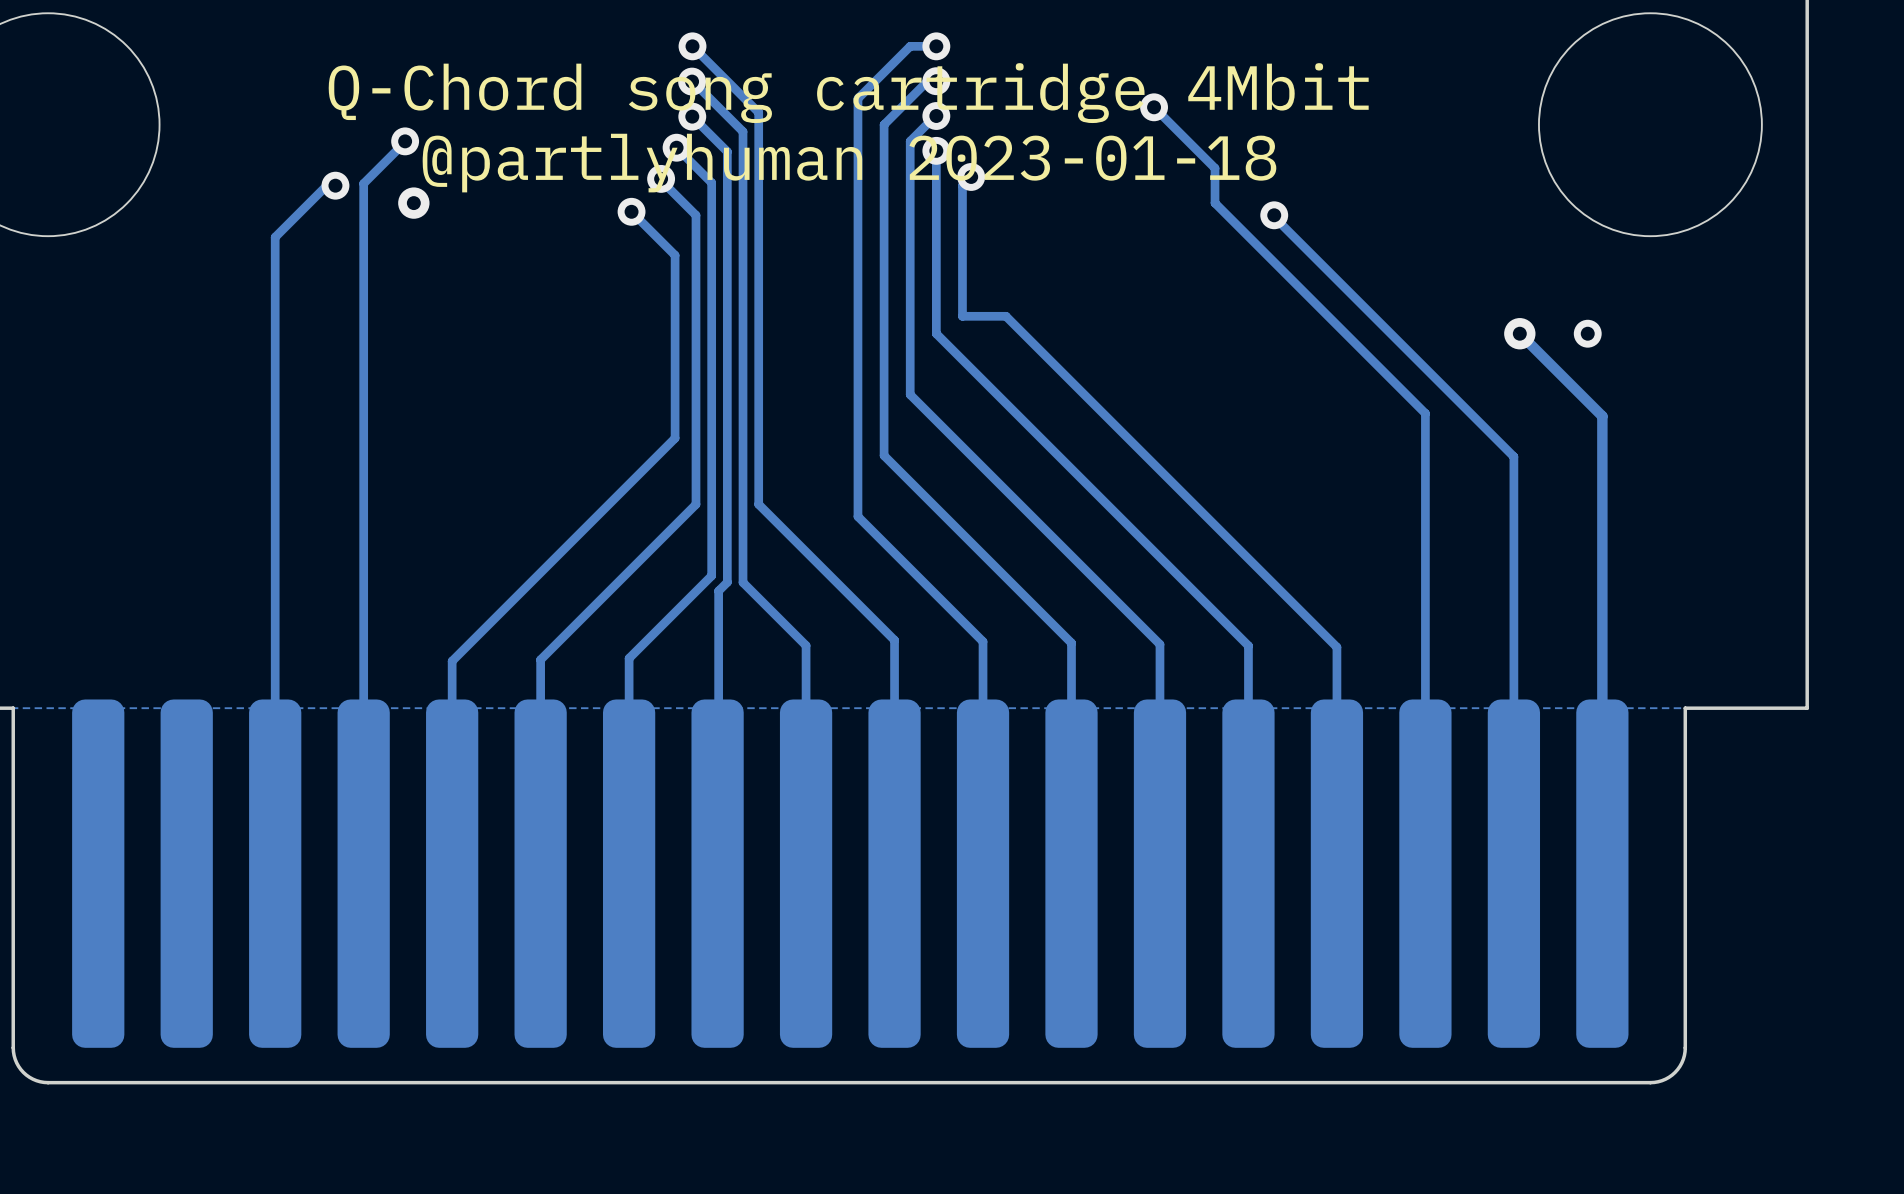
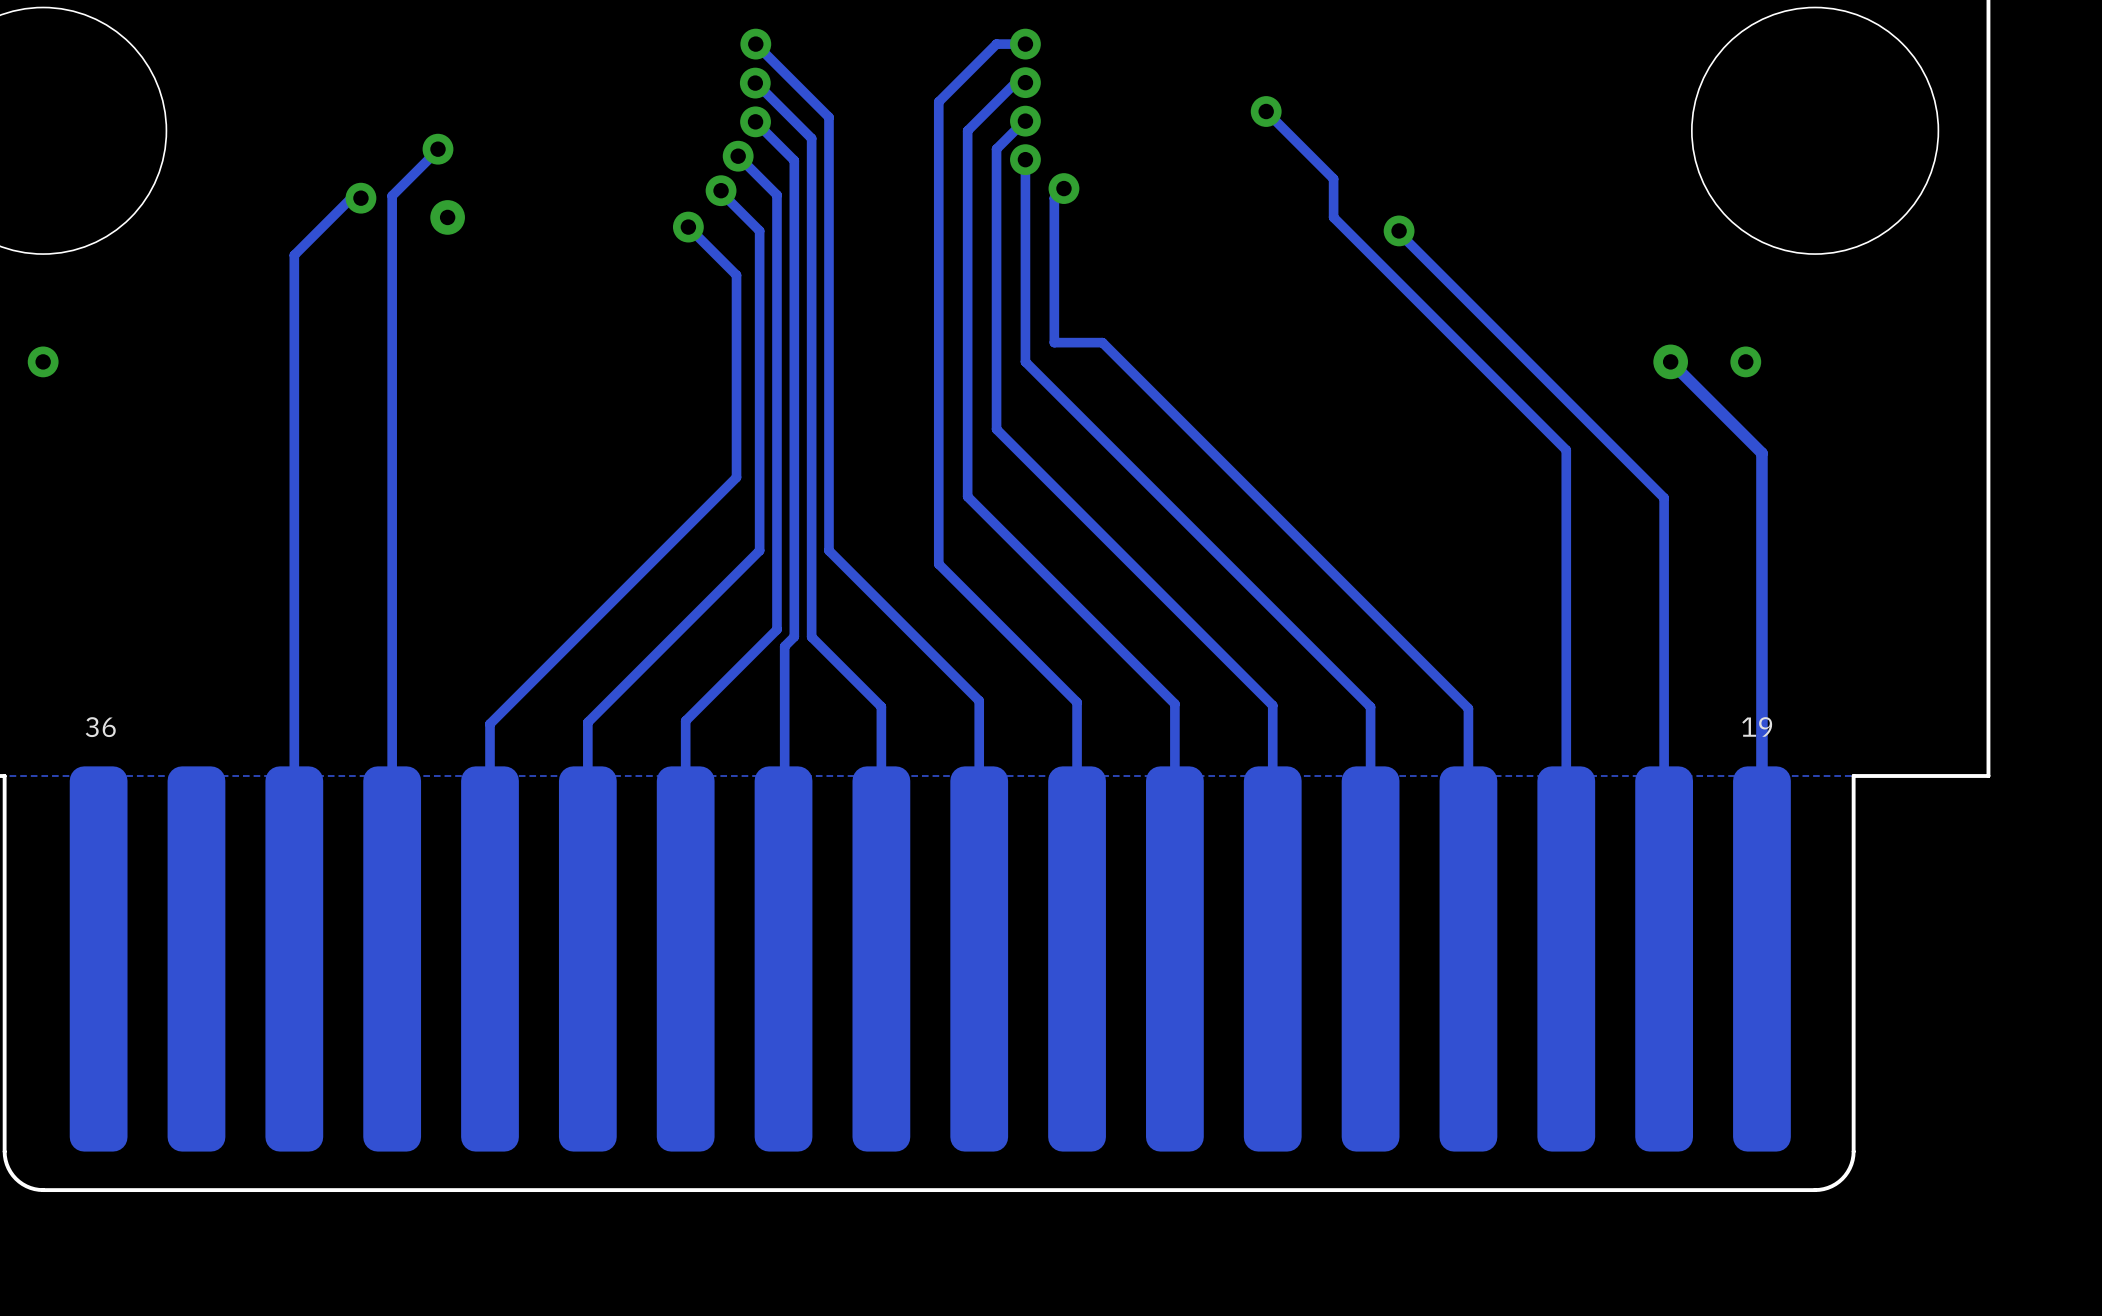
text: Q-Chord song cartridge 4Mbit (848, 93) -> none
text: @partlyhuman 2023-01-18 (849, 163) -> none
via: none -> (43, 361)
text: none -> 36 (100, 727)
text: none -> 19 (1757, 726)

